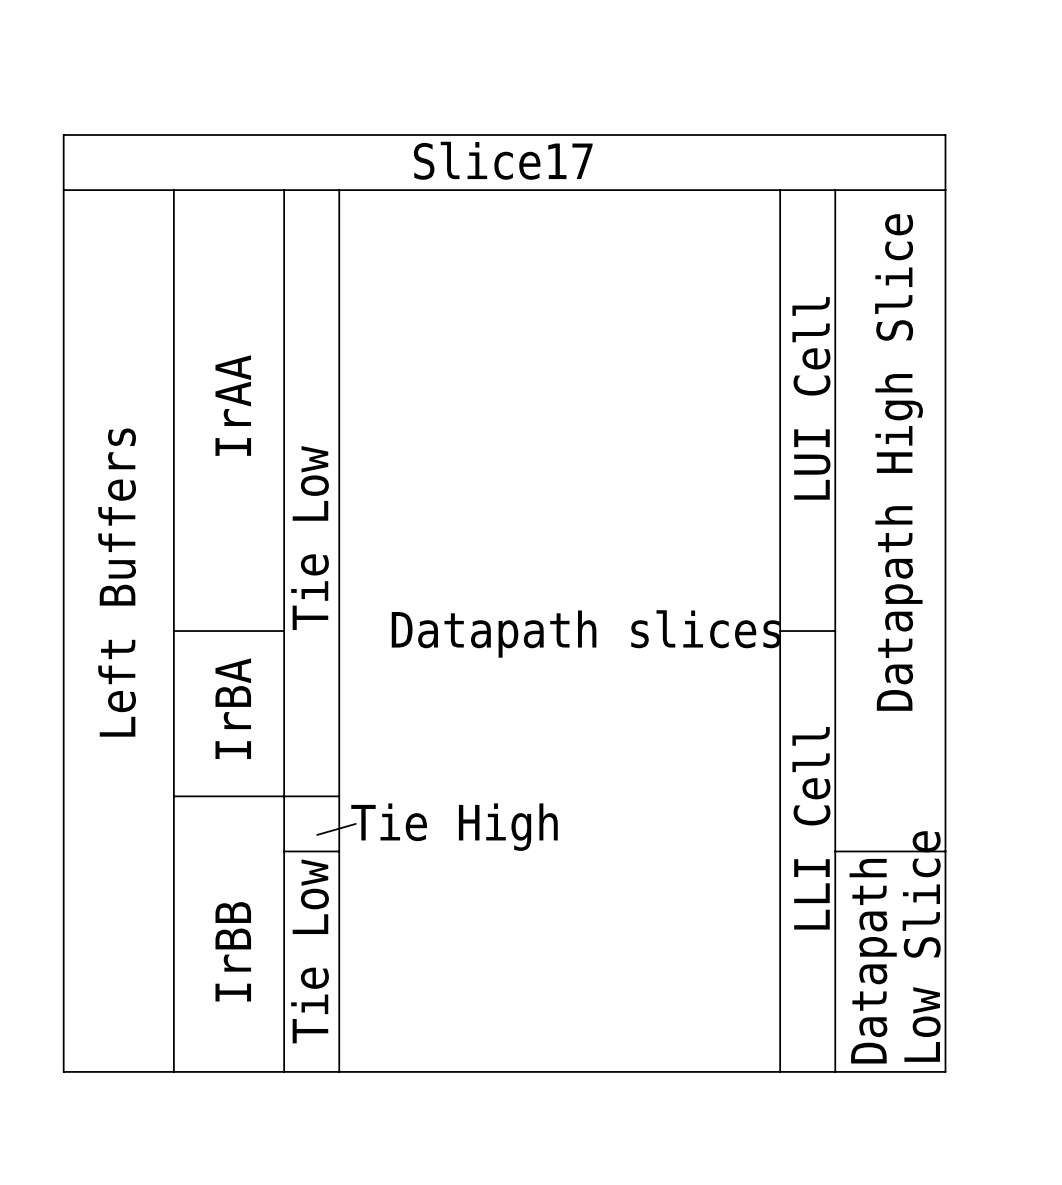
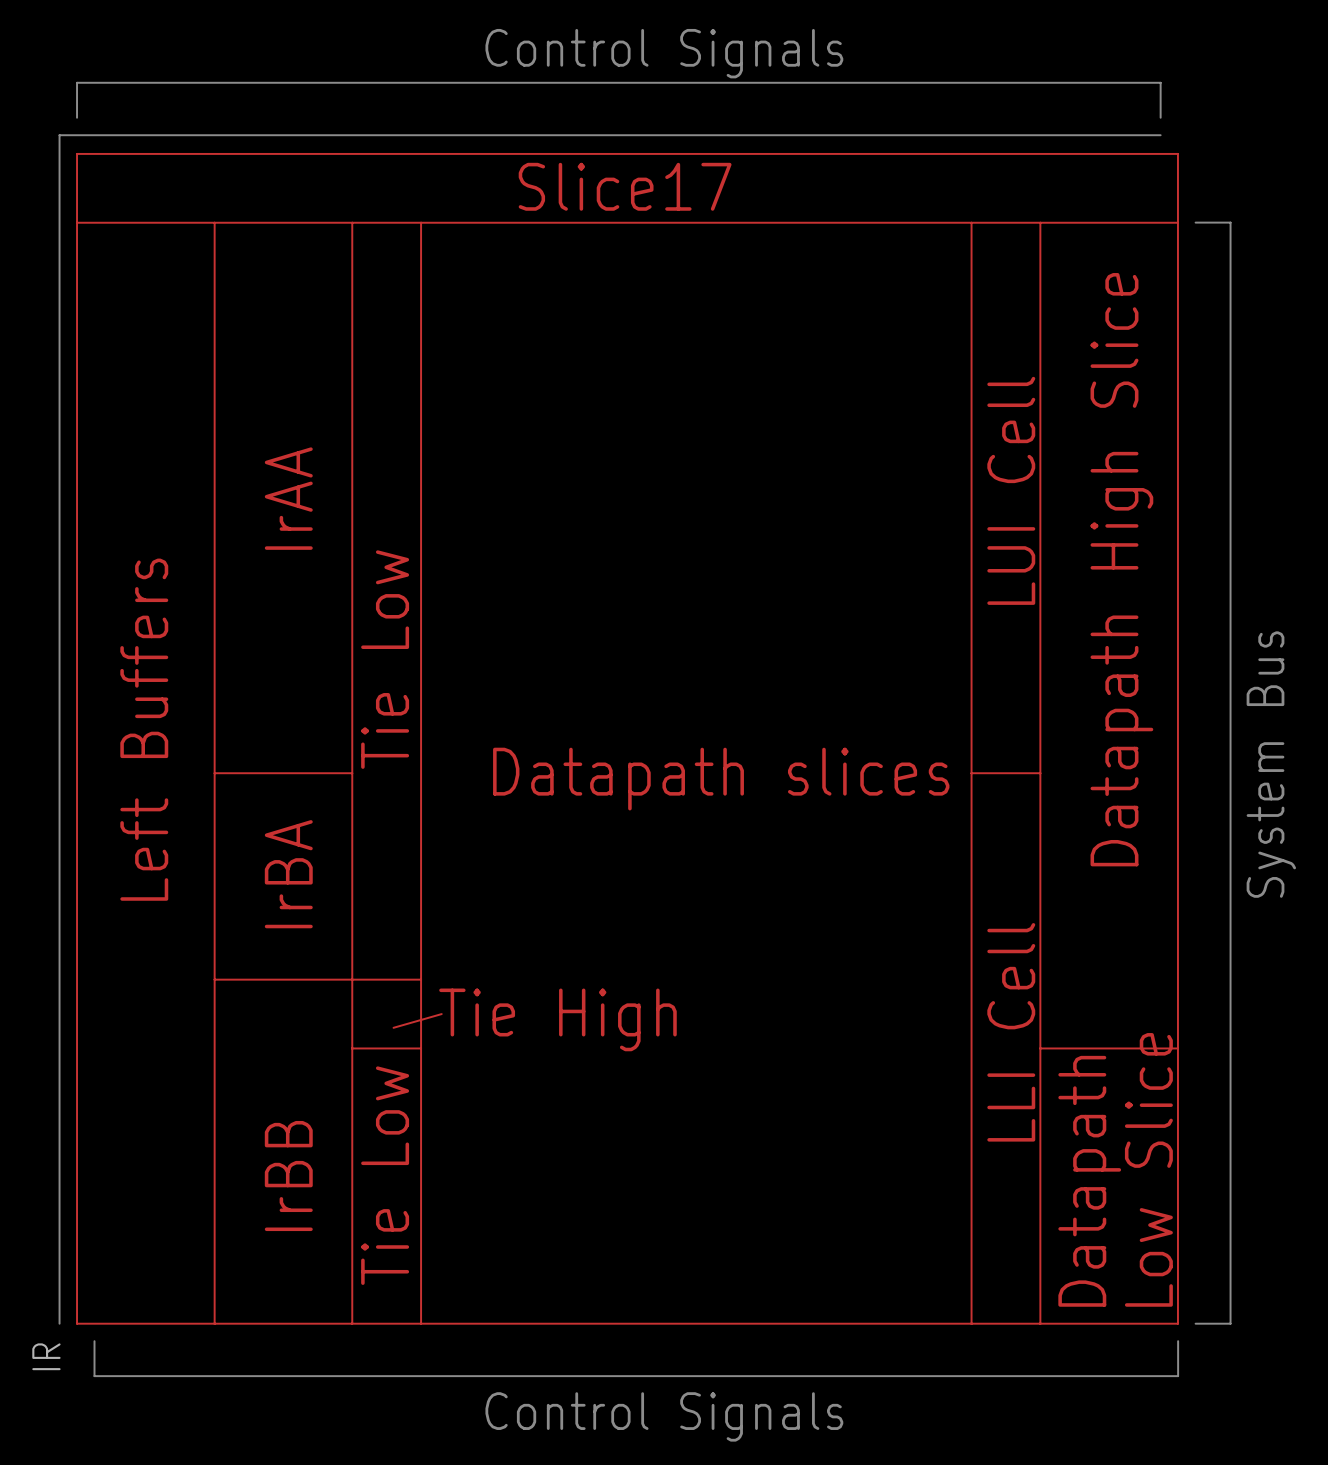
text: none -> Control Signals (664, 53)
line: none -> (77, 117) (77, 82) (1160, 82) (1160, 117)
bus: none -> (1160, 135) (59, 135) (59, 1323)
line: none -> (1195, 222) (1230, 222) (1230, 1323) (1195, 1323)
text: none -> System Bus (1271, 764)
line: none -> (94, 1341) (94, 1376) (1178, 1376) (1178, 1341)
label: none -> IR (46, 1356)
text: none -> Control Signals (664, 1416)

